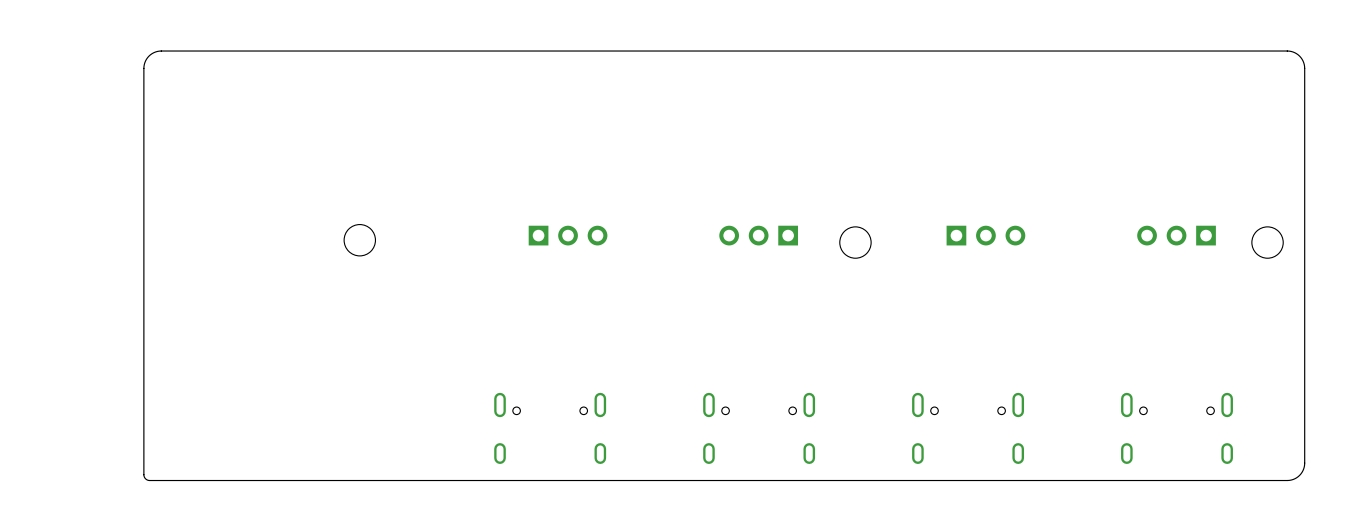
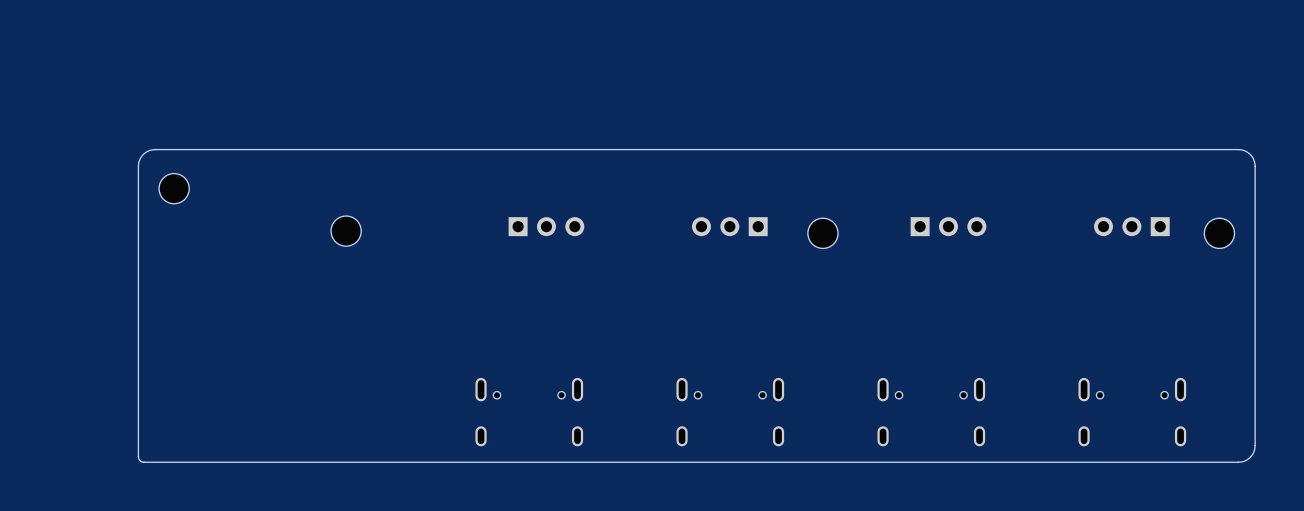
board edge: (1304, 172) (1304, 66) (1299, 56) (1287, 51) (159, 51) (148, 56) (143, 66) (143, 172) -> (1255, 166) (1250, 154) (1238, 149) (155, 149) (143, 154) (138, 166)
part: none -> (174, 188)

